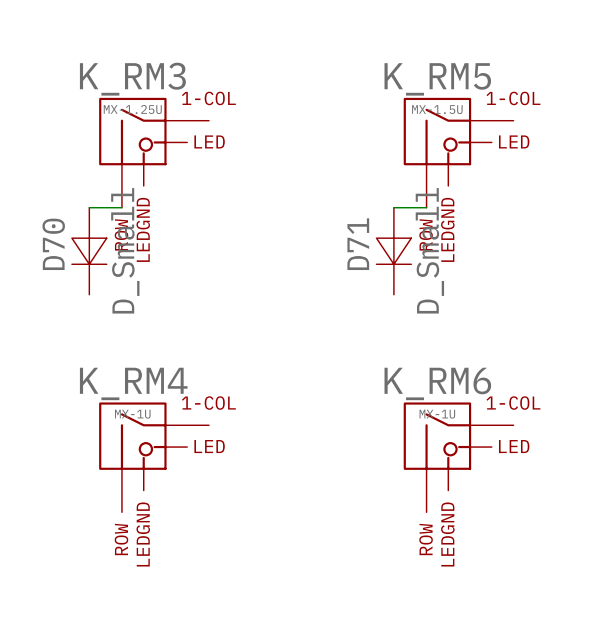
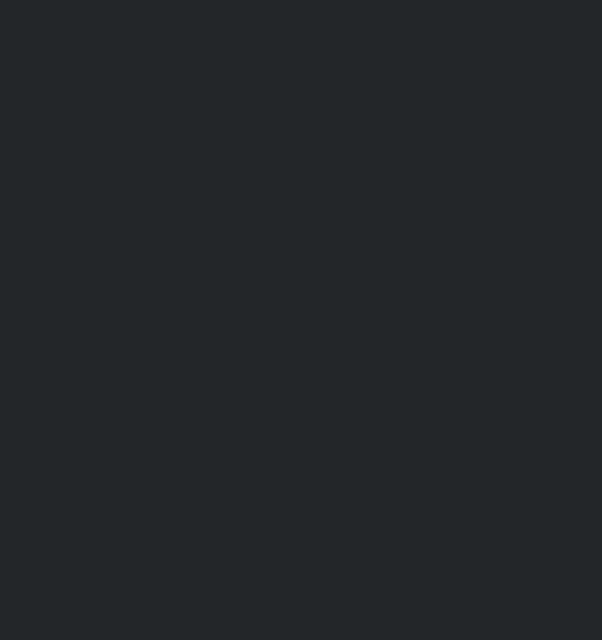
K_RM3: MX-1.25U (154, 152) -> none
K_RM5: MX-1.5U (458, 152) -> none
wire: (89, 207) (121, 207) -> none
wire: (393, 207) (426, 207) -> none
D70: D_Small (89, 251) -> none
D71: D_Small (393, 251) -> none
K_RM4: MX-1U (154, 457) -> none
K_RM6: MX-1U (458, 457) -> none

